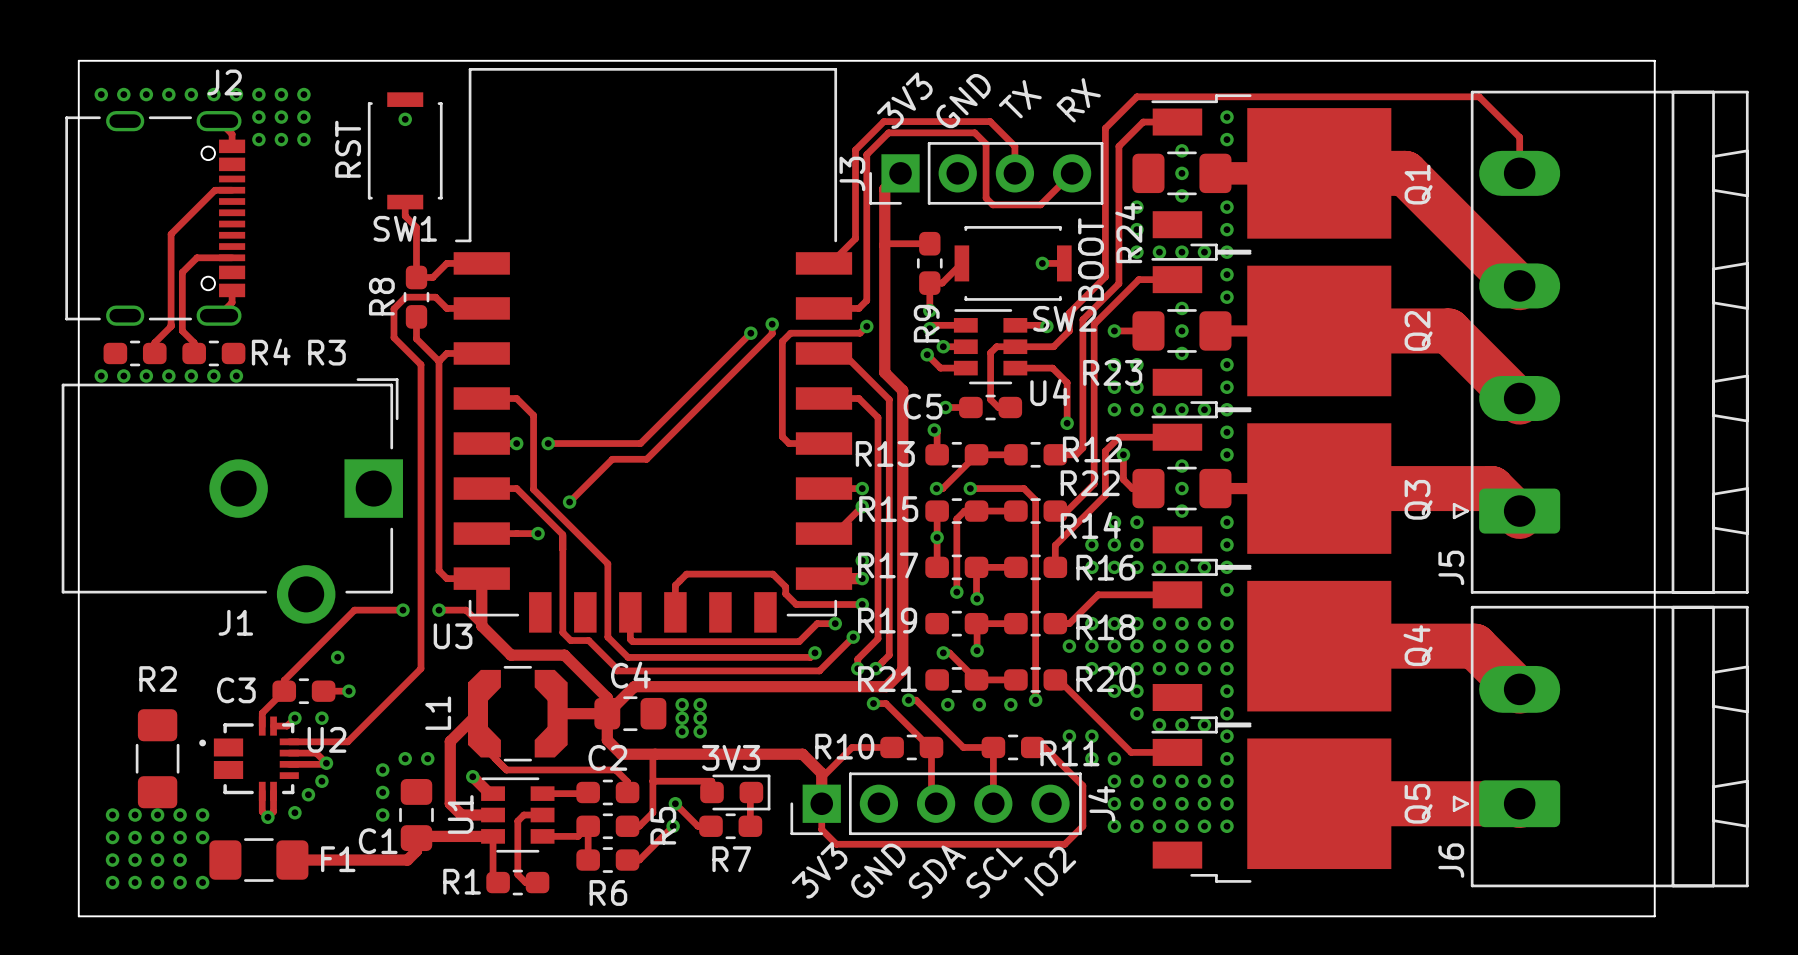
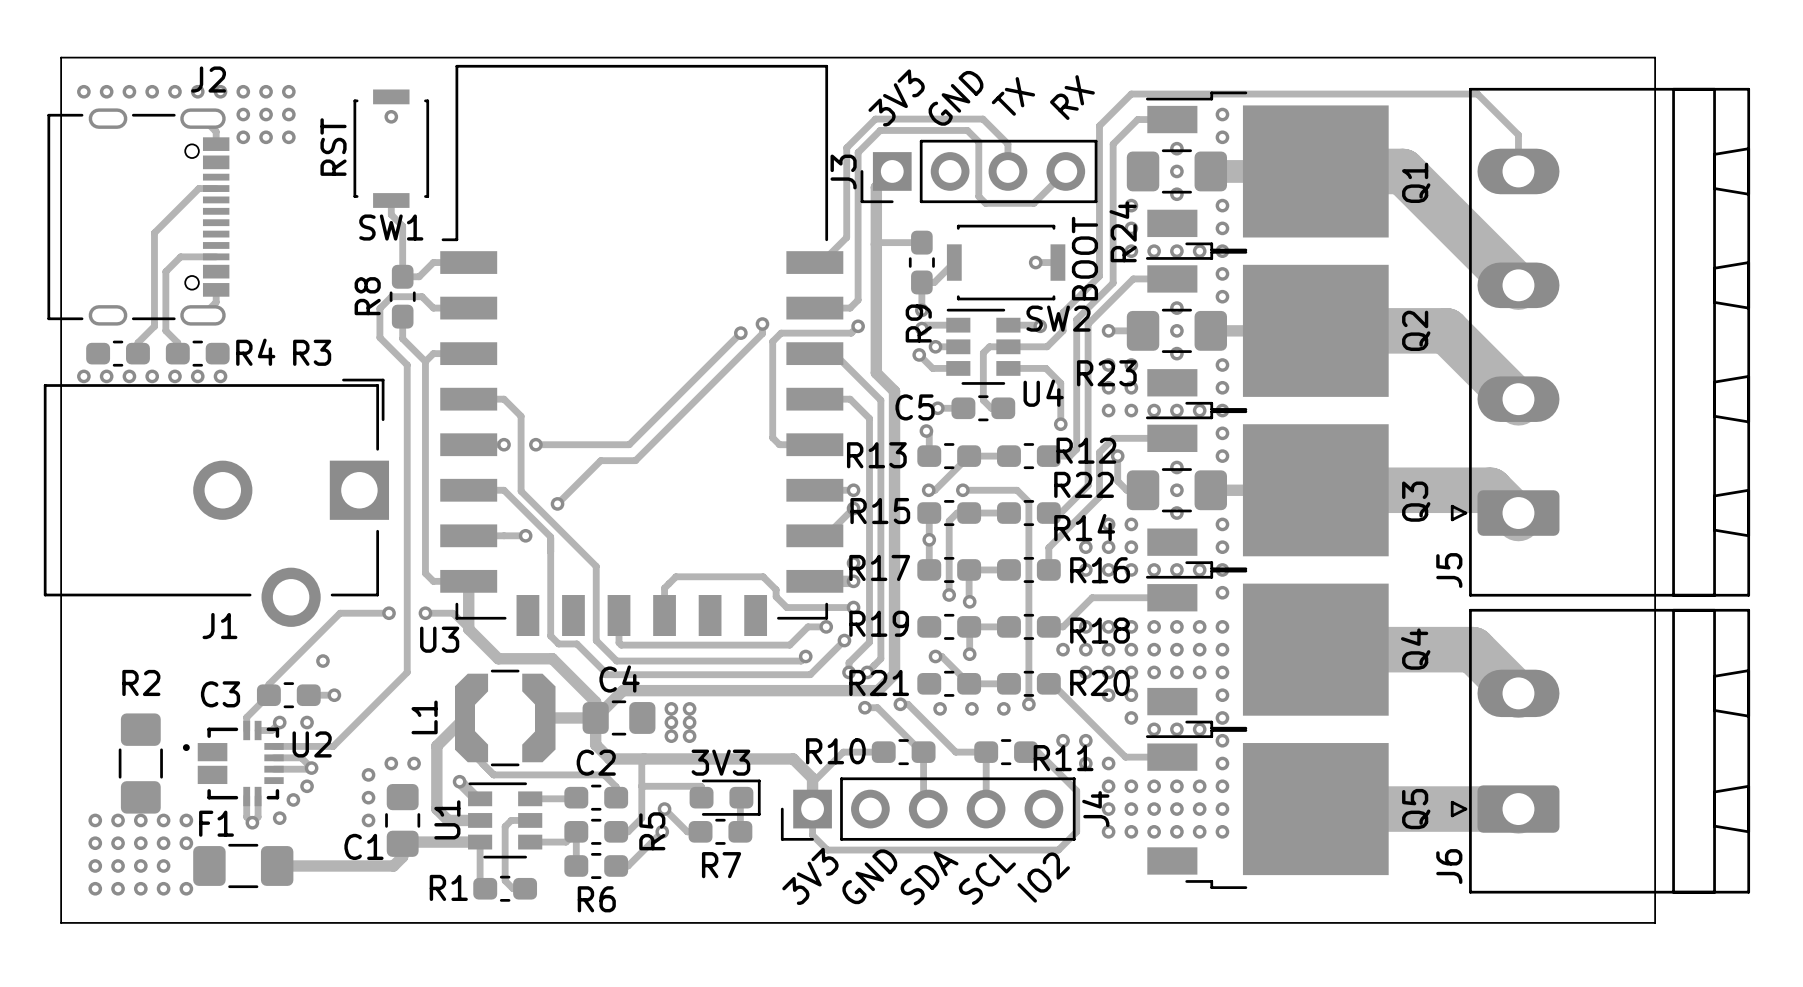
F1 name position: F1 (338, 859) -> F1 (216, 823)

